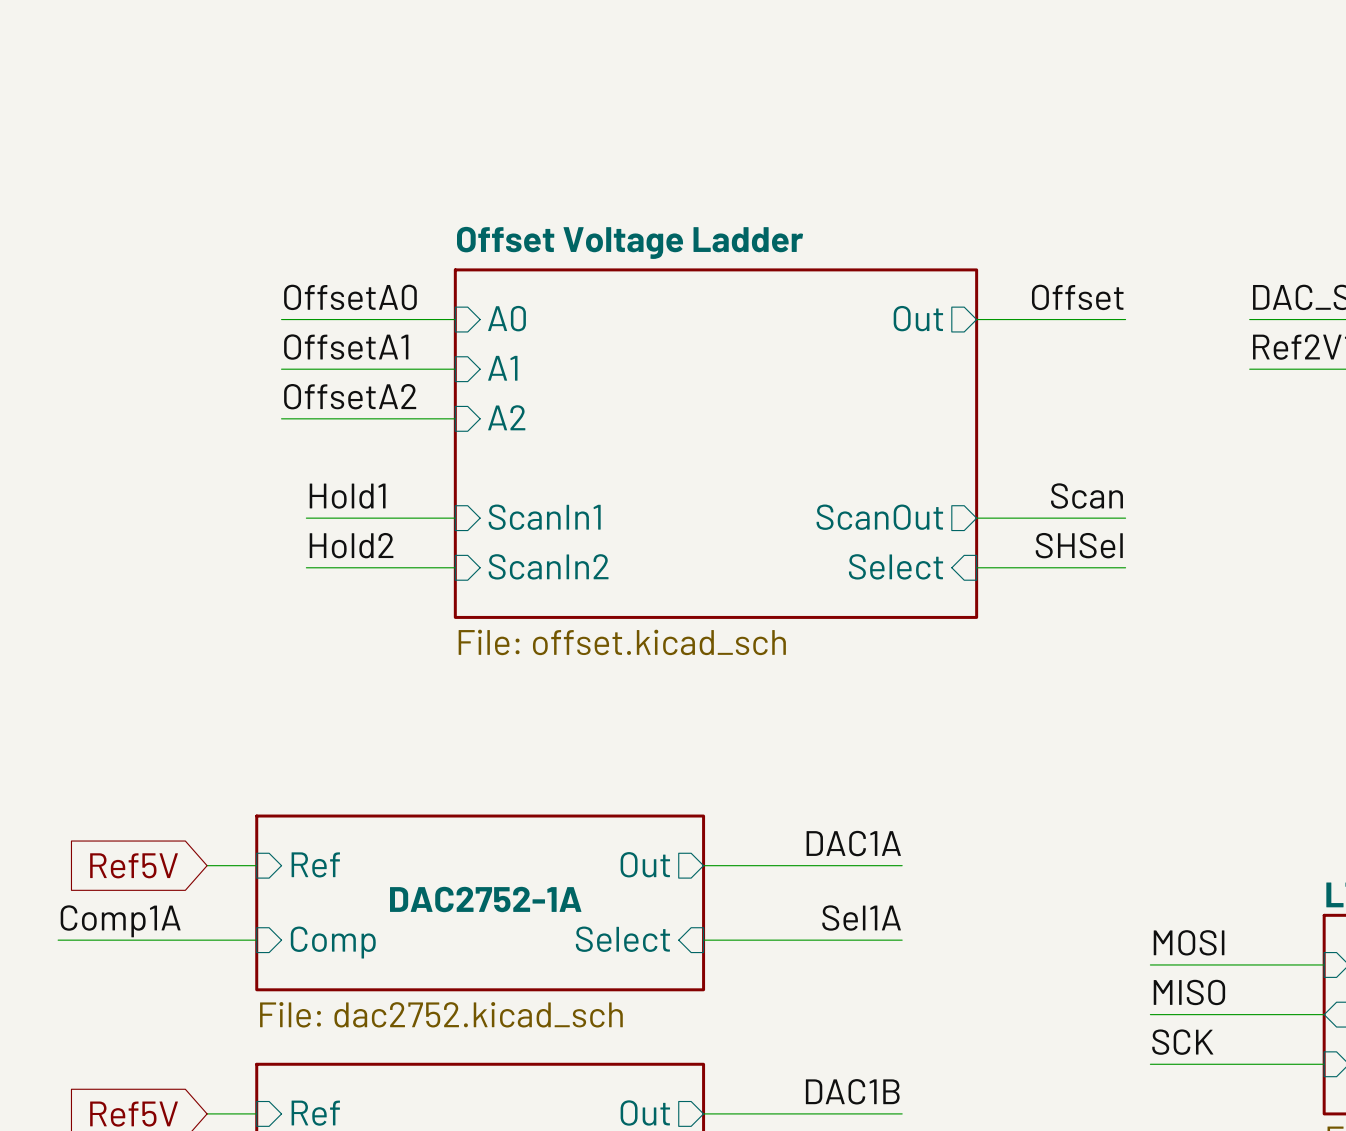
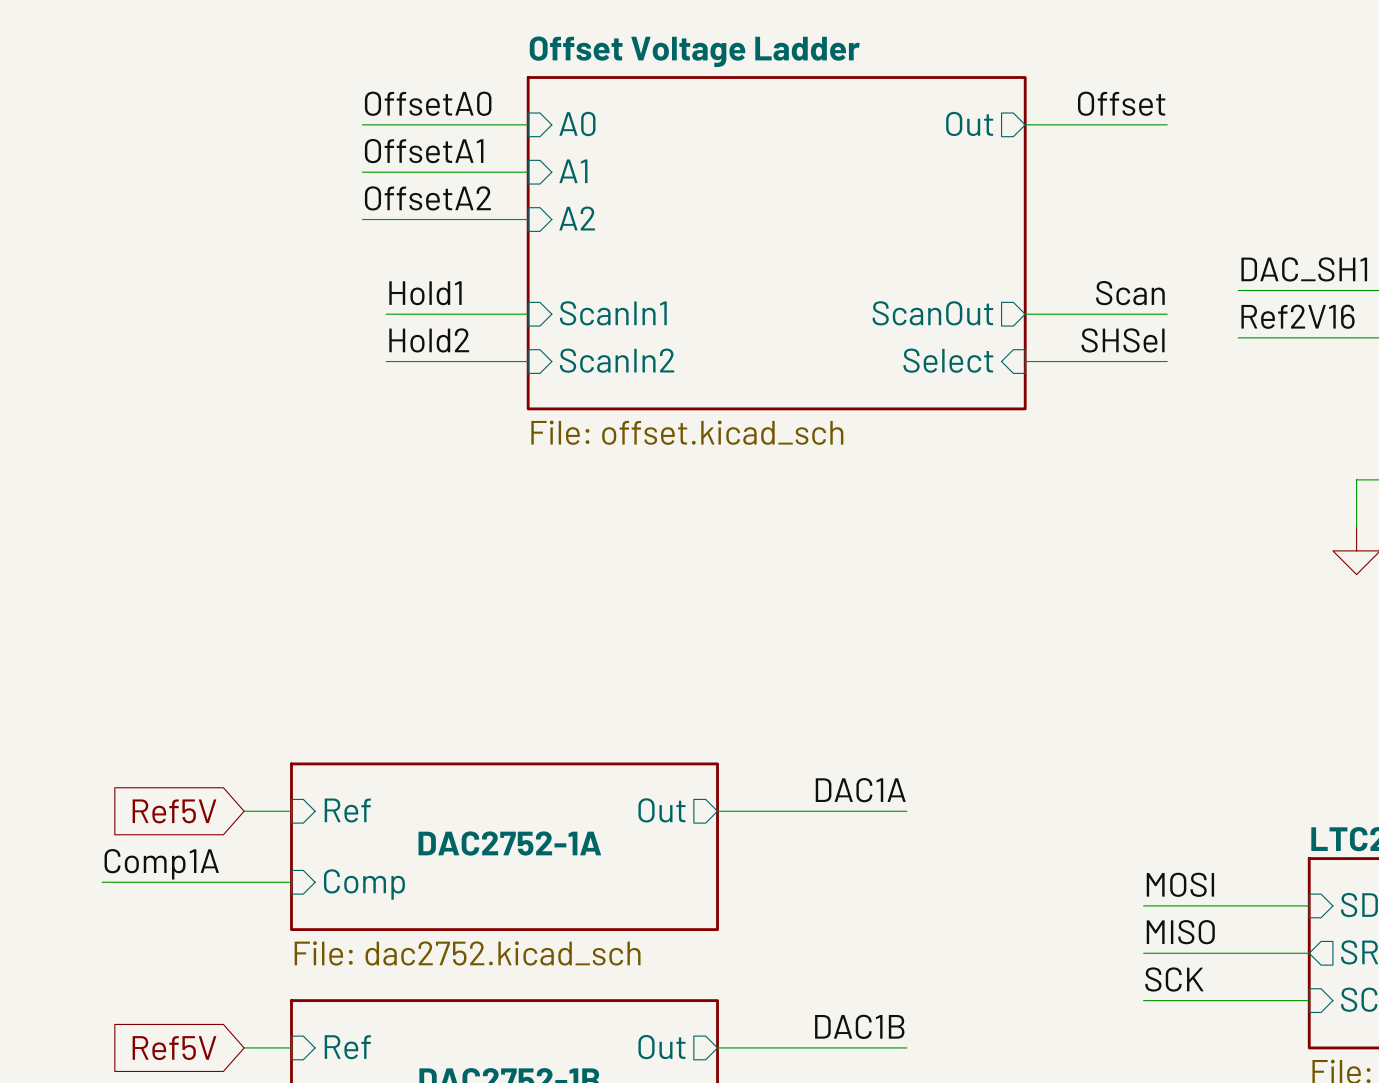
label position: OffsetA0 (350, 297) -> OffsetA0 (428, 103)
label position: Offset (1077, 297) -> Offset (1121, 103)
sheet pin position: A0 (506, 318) -> A0 (577, 123)
sheet pin position: Out (918, 318) -> Out (969, 123)
wire: (281, 319) (455, 319) -> (362, 124) (528, 124)
wire: (976, 319) (1125, 319) -> (1025, 124) (1167, 124)
label position: OffsetA1 (346, 347) -> OffsetA1 (424, 151)
sheet pin position: A1 (502, 368) -> A1 (573, 171)
wire: (281, 369) (455, 369) -> (362, 172) (528, 172)
label position: OffsetA2 (350, 396) -> OffsetA2 (427, 198)
sheet pin position: A2 (506, 417) -> A2 (577, 218)
wire: (281, 418) (455, 418) -> (362, 219) (528, 219)
sheet Offset Voltage Ladder position: (715, 443) -> (776, 243)
label position: Scan (1087, 495) -> Scan (1130, 293)
label position: Hold1 (347, 496) -> Hold1 (425, 293)
sheet pin position: ScanIn1 (544, 517) -> ScanIn1 (613, 313)
sheet pin position: ScanOut (879, 517) -> ScanOut (932, 313)
wire: (306, 518) (455, 518) -> (386, 314) (528, 314)
wire: (976, 518) (1125, 518) -> (1025, 314) (1167, 314)
label position: Hold2 (351, 545) -> Hold2 (429, 340)
label position: SHSel (1079, 545) -> SHSel (1123, 340)
sheet pin position: ScanIn2 (548, 566) -> ScanIn2 (617, 360)
sheet pin position: Select (896, 566) -> Select (948, 360)
wire: (306, 567) (455, 567) -> (386, 361) (528, 361)
wire: (976, 567) (1125, 567) -> (1025, 361) (1167, 361)
label: Sel1A (861, 918) -> none
sheet pin: Select (622, 939) -> none
wire: (703, 940) (902, 940) -> none

